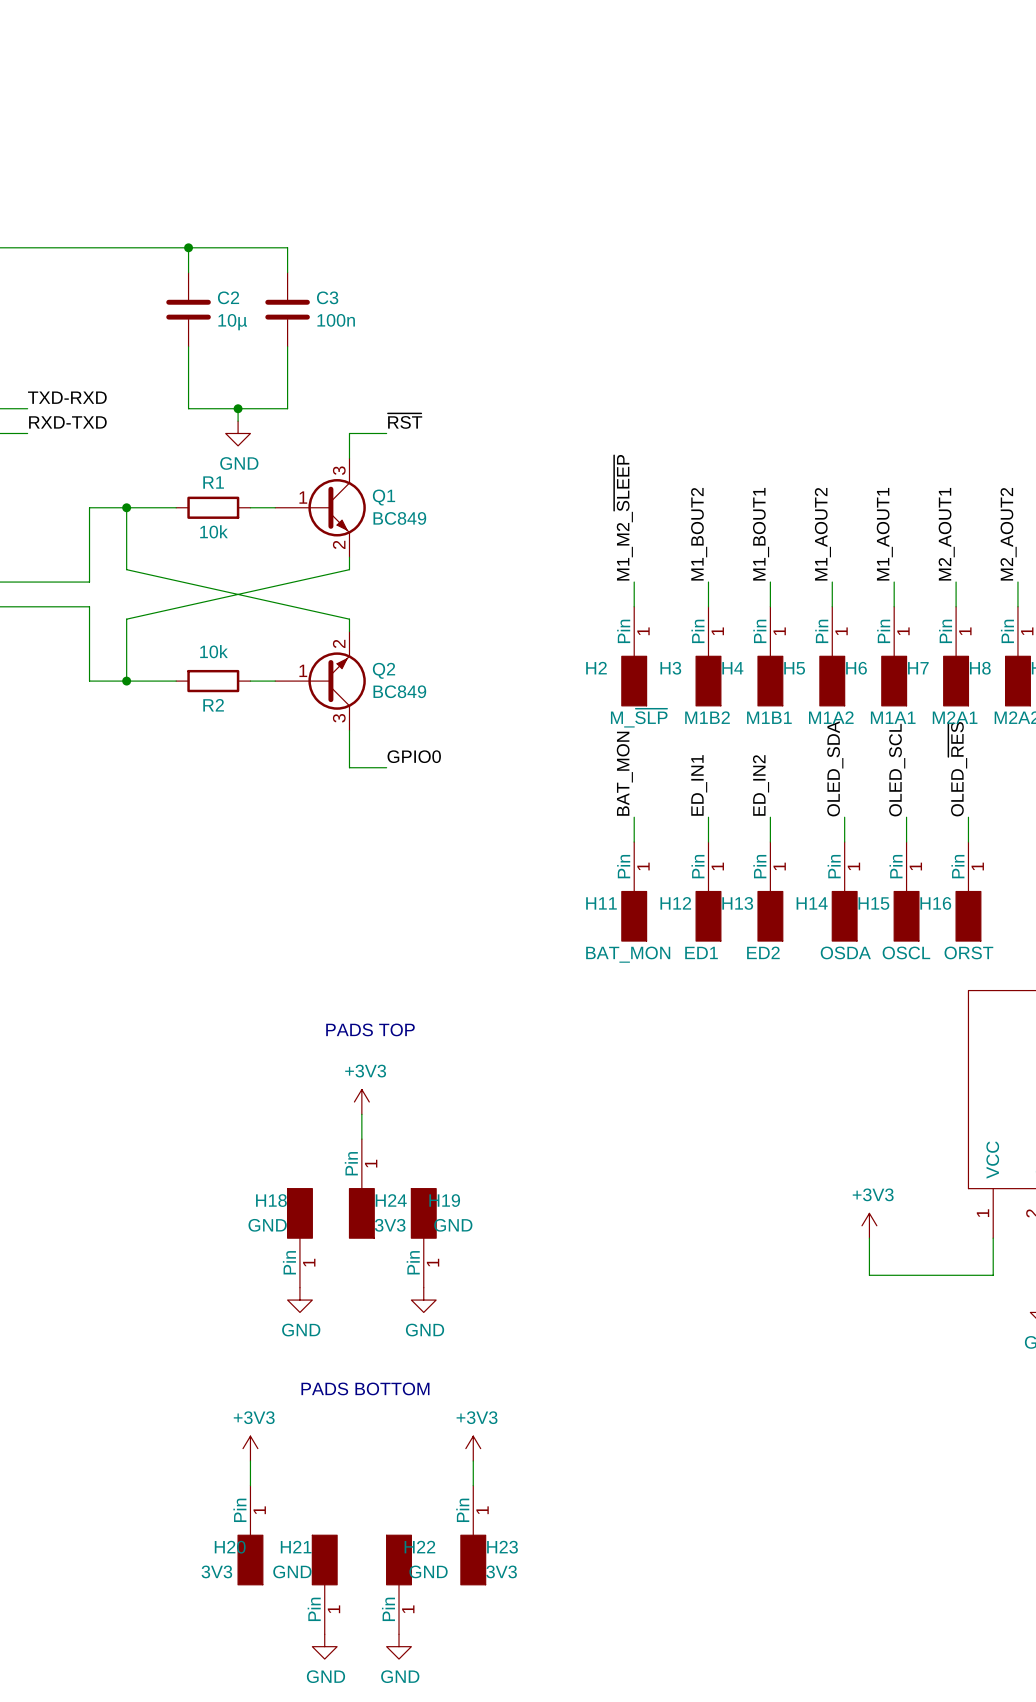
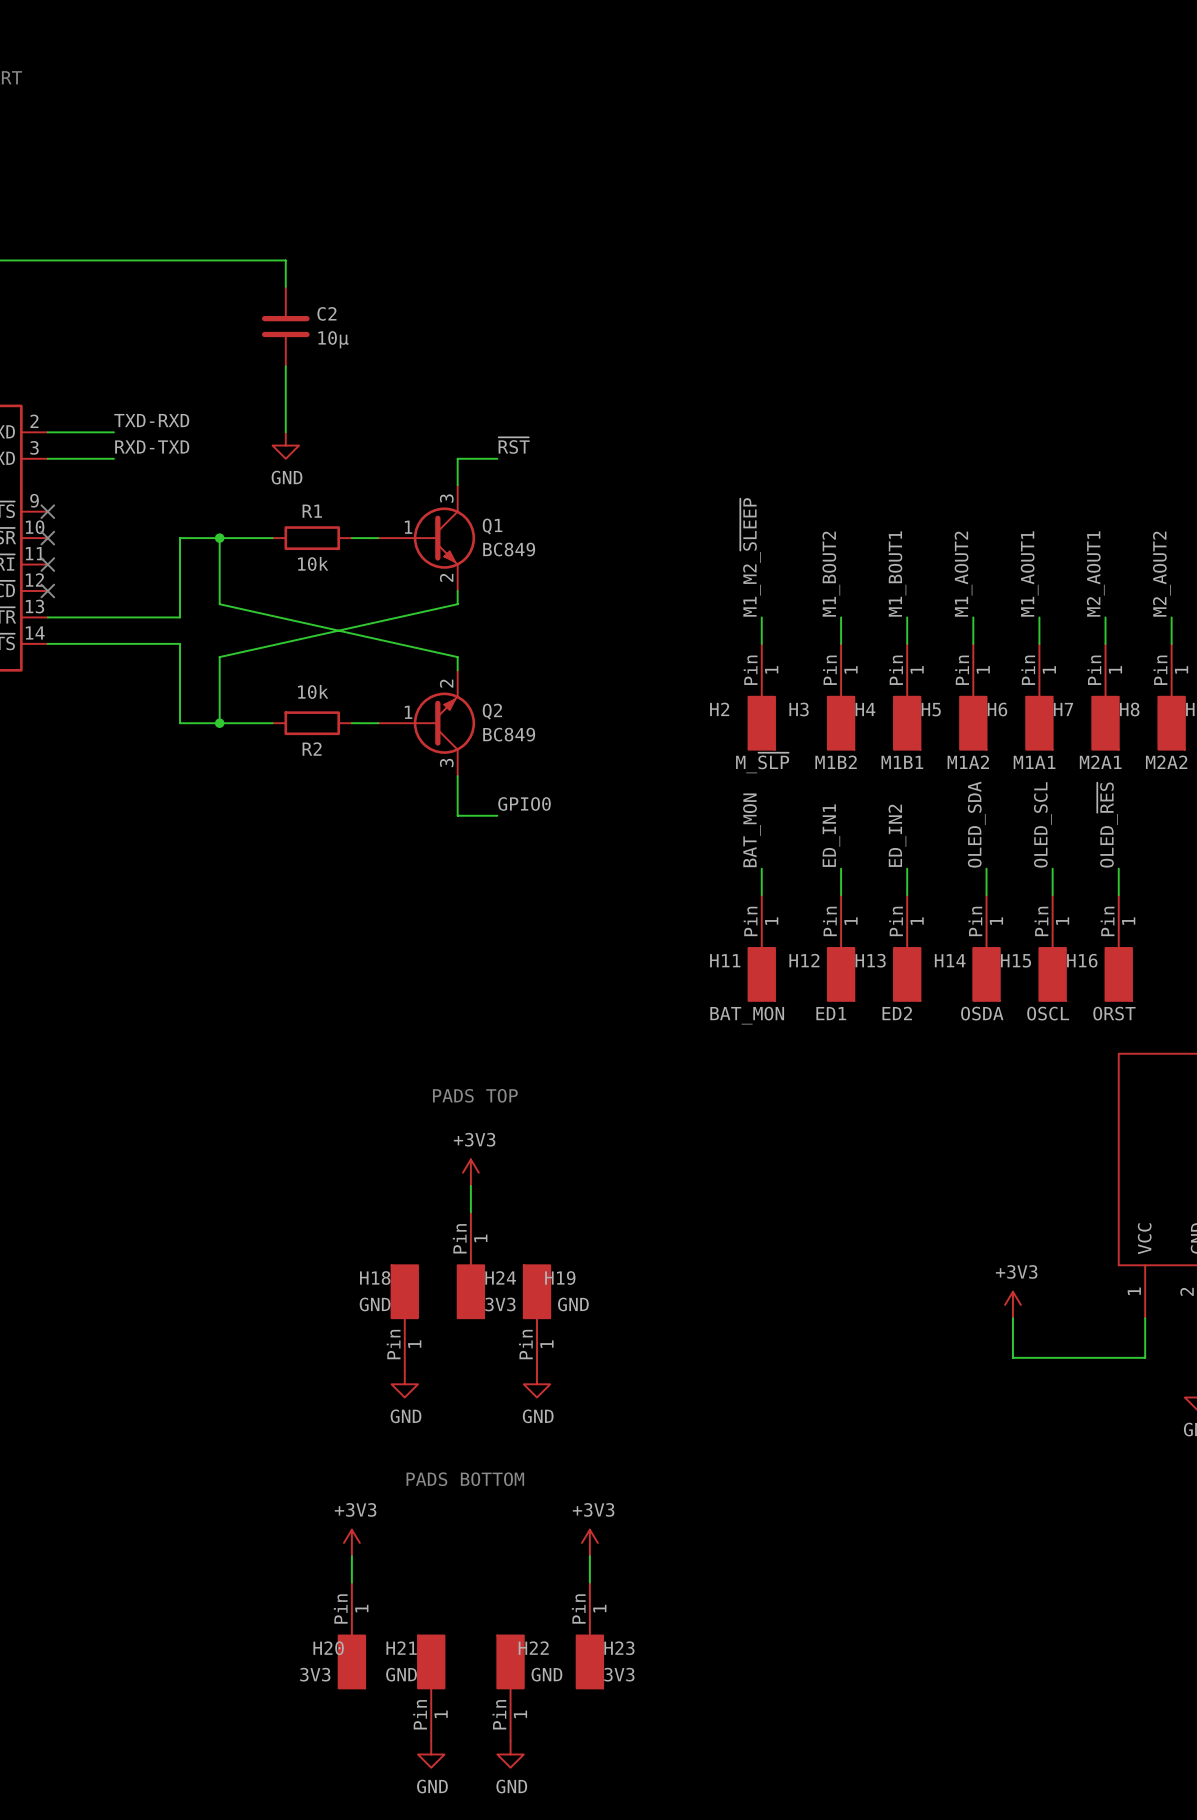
wire: (188, 247) (287, 247) (287, 272) -> none
junction: (188, 247) -> none
C3: 100n (287, 309) -> none
wire: (287, 346) (287, 408) (188, 408) -> none
wire: (238, 408) (238, 421) -> none
junction: (238, 408) -> none
power symbol position: GND (238, 433) -> GND (285, 445)

